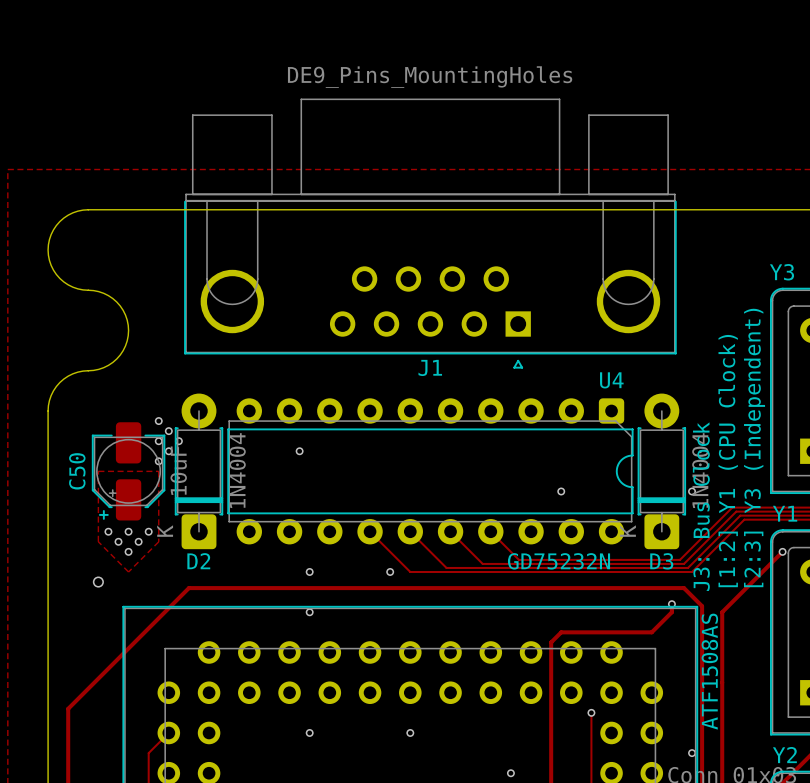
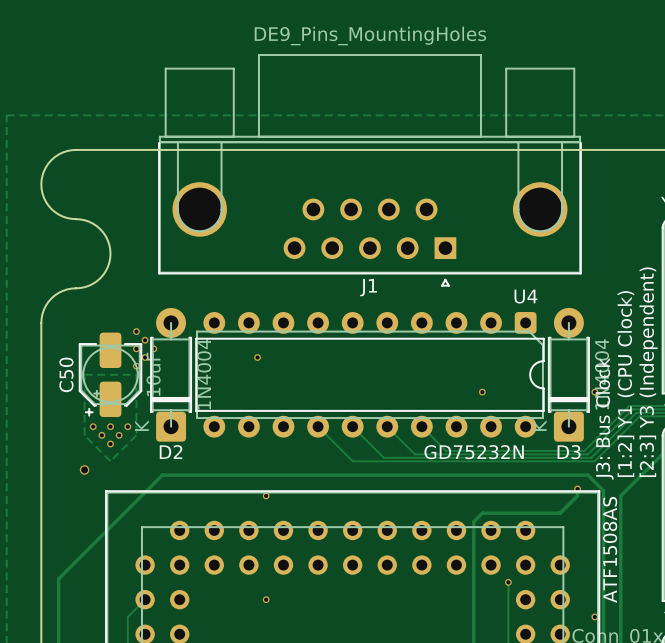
J1 footprint: [184, 98, 677, 369] -> [158, 54, 582, 287]
via: (309, 571) -> none
via: (390, 571) -> none
via: (410, 732) -> none
via: (510, 773) -> none

